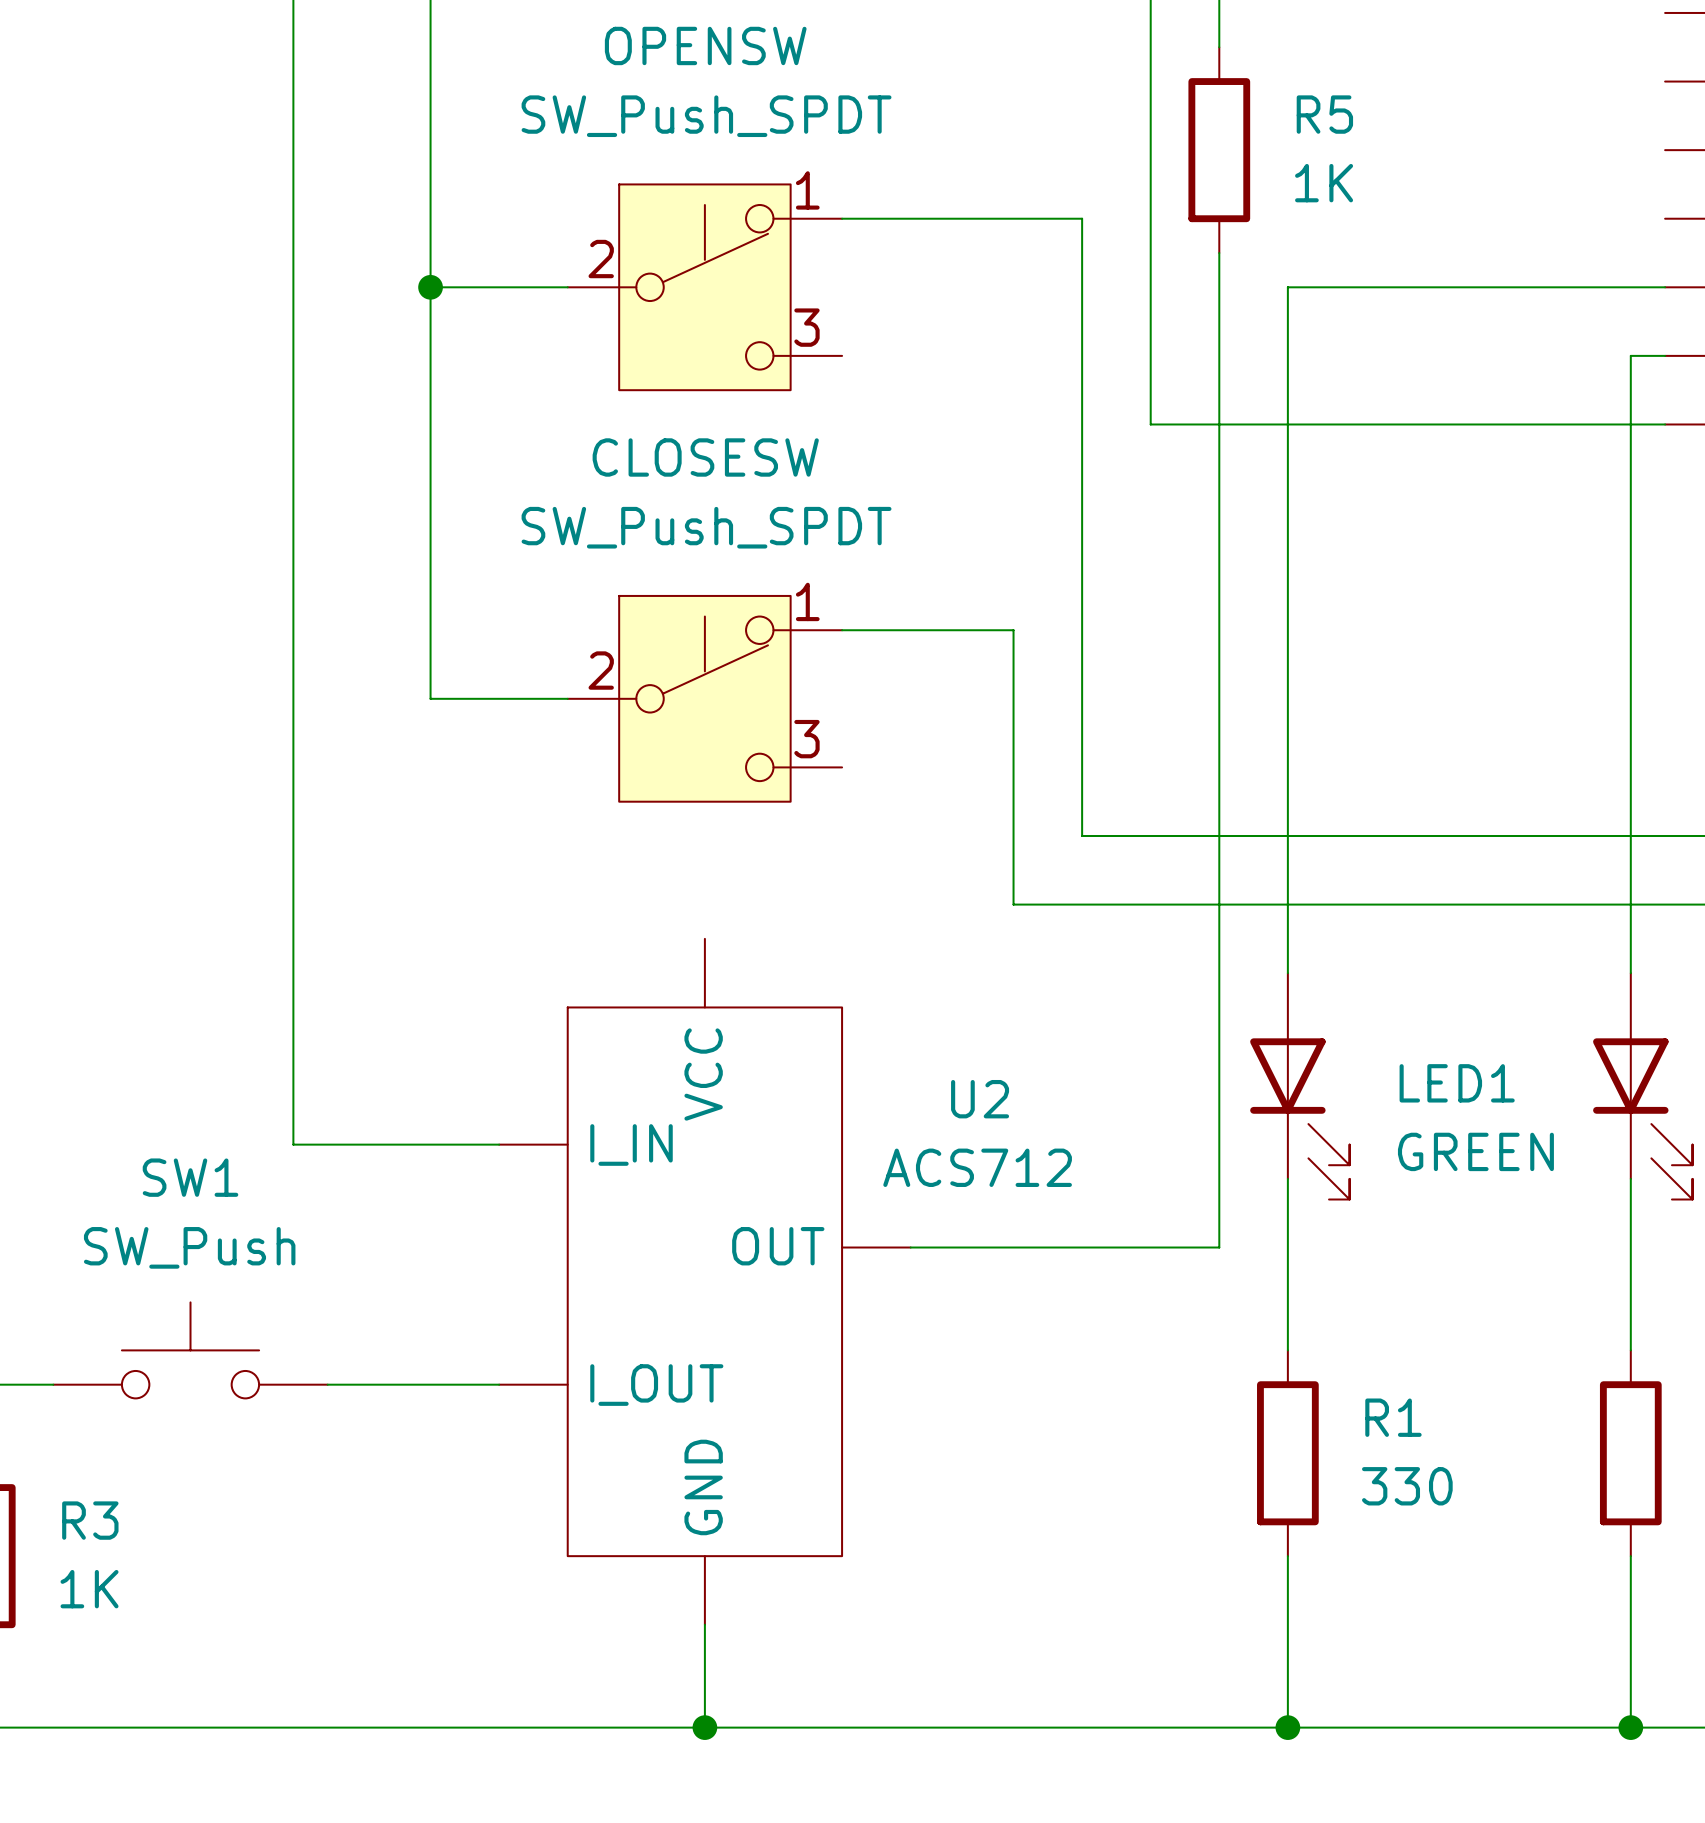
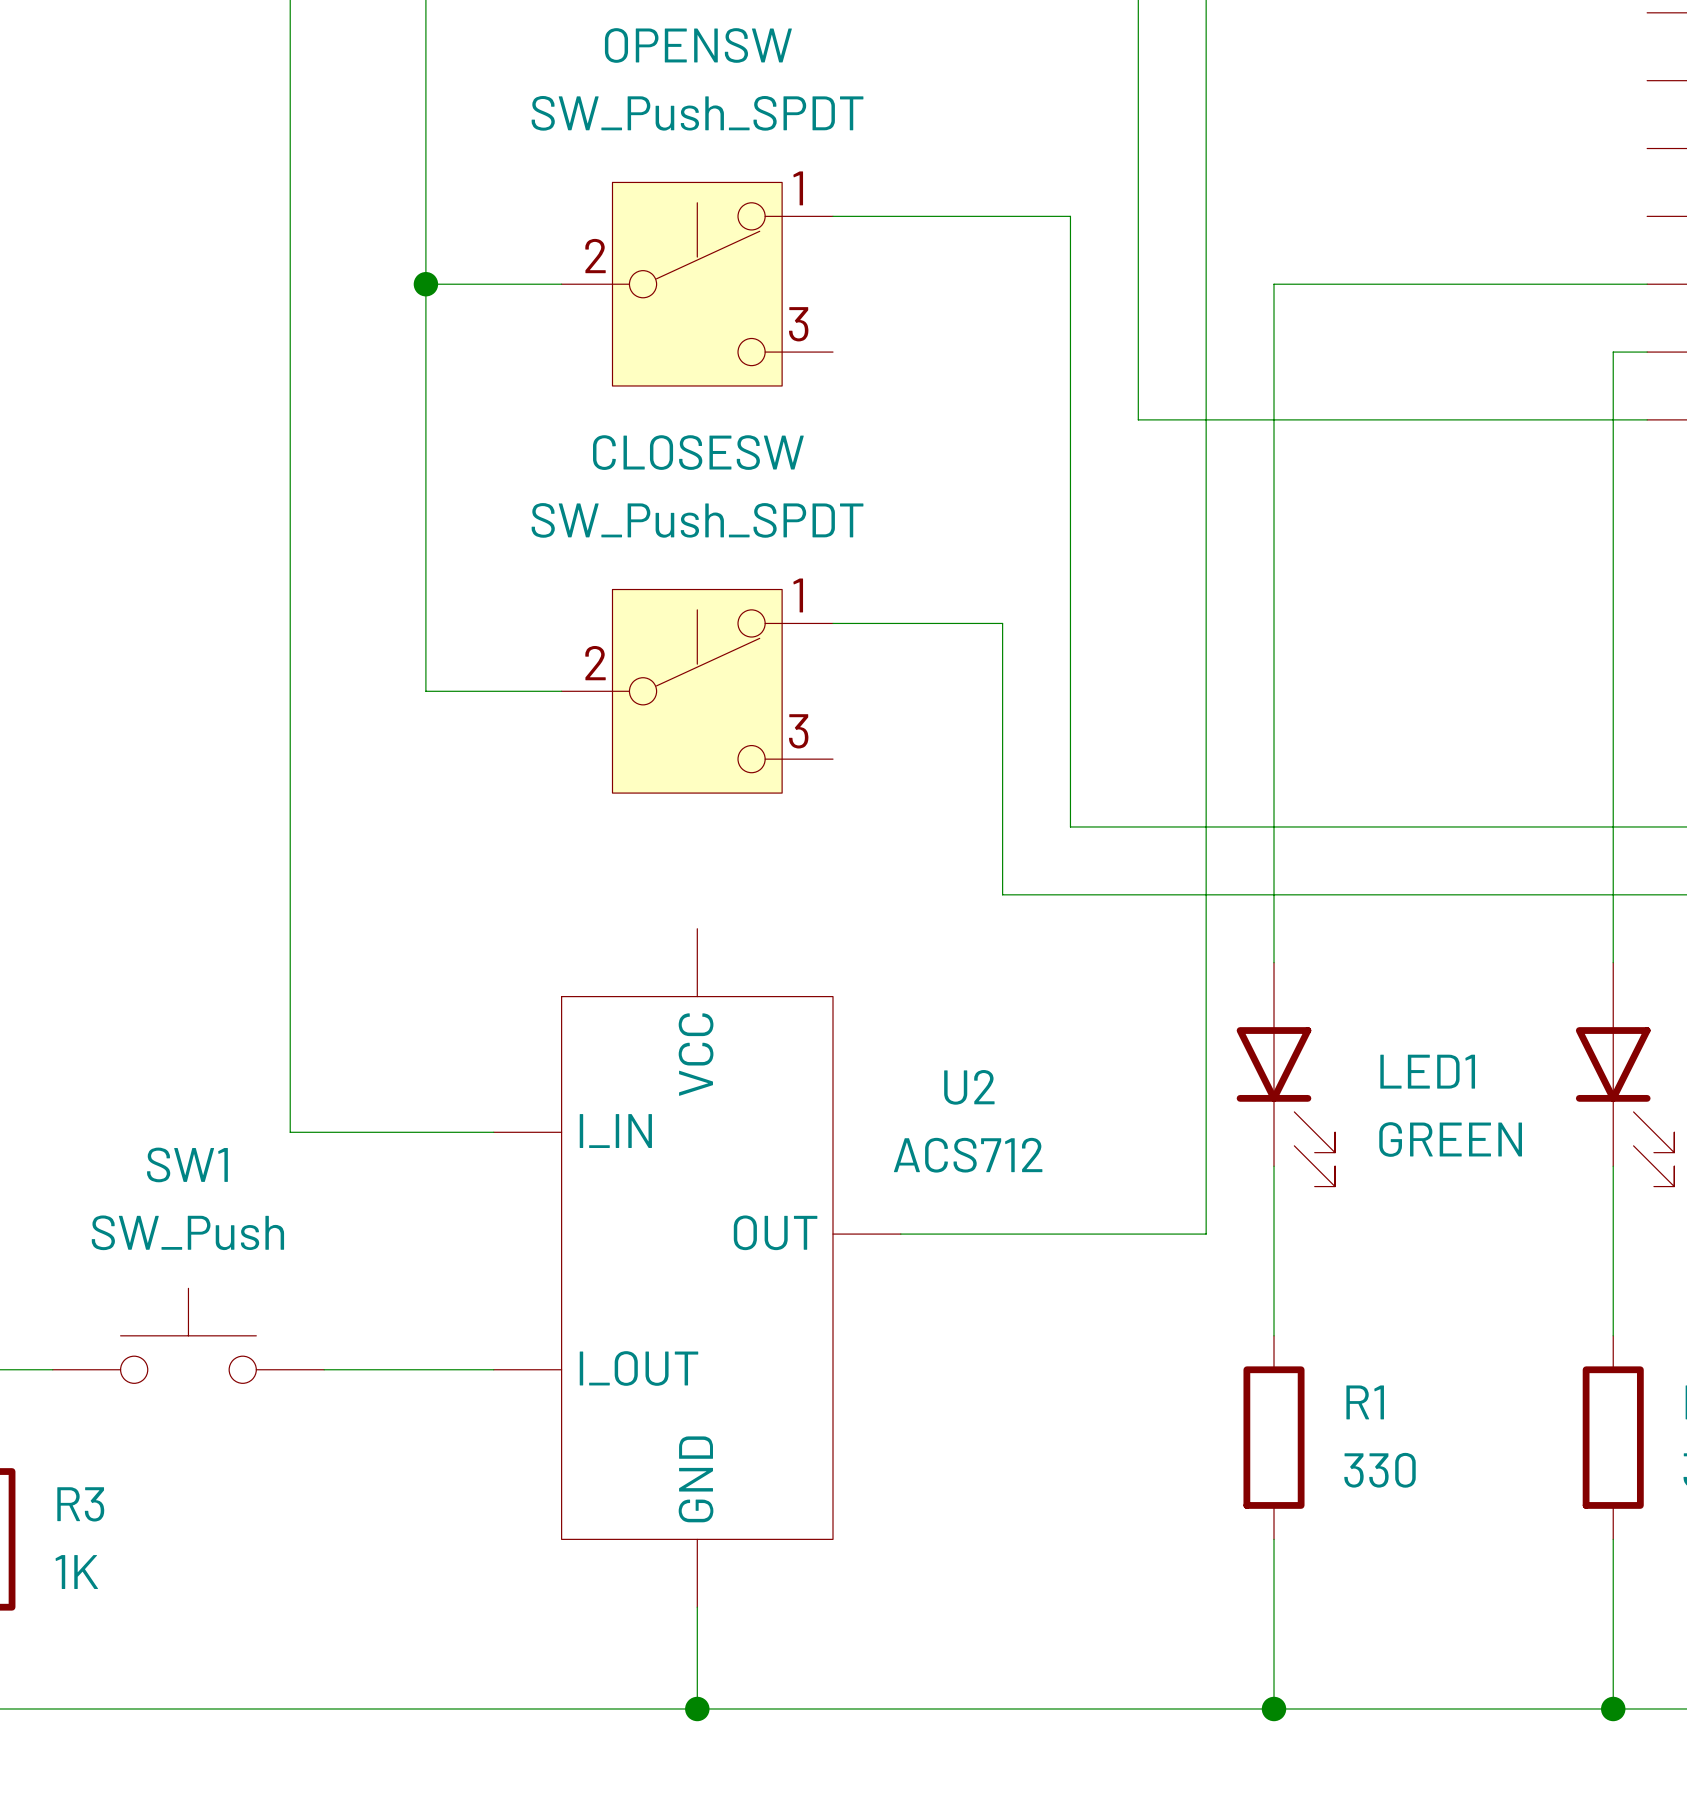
wire: none -> (1206, 46) (1206, 250)
R5: 1K (1219, 150) -> none

